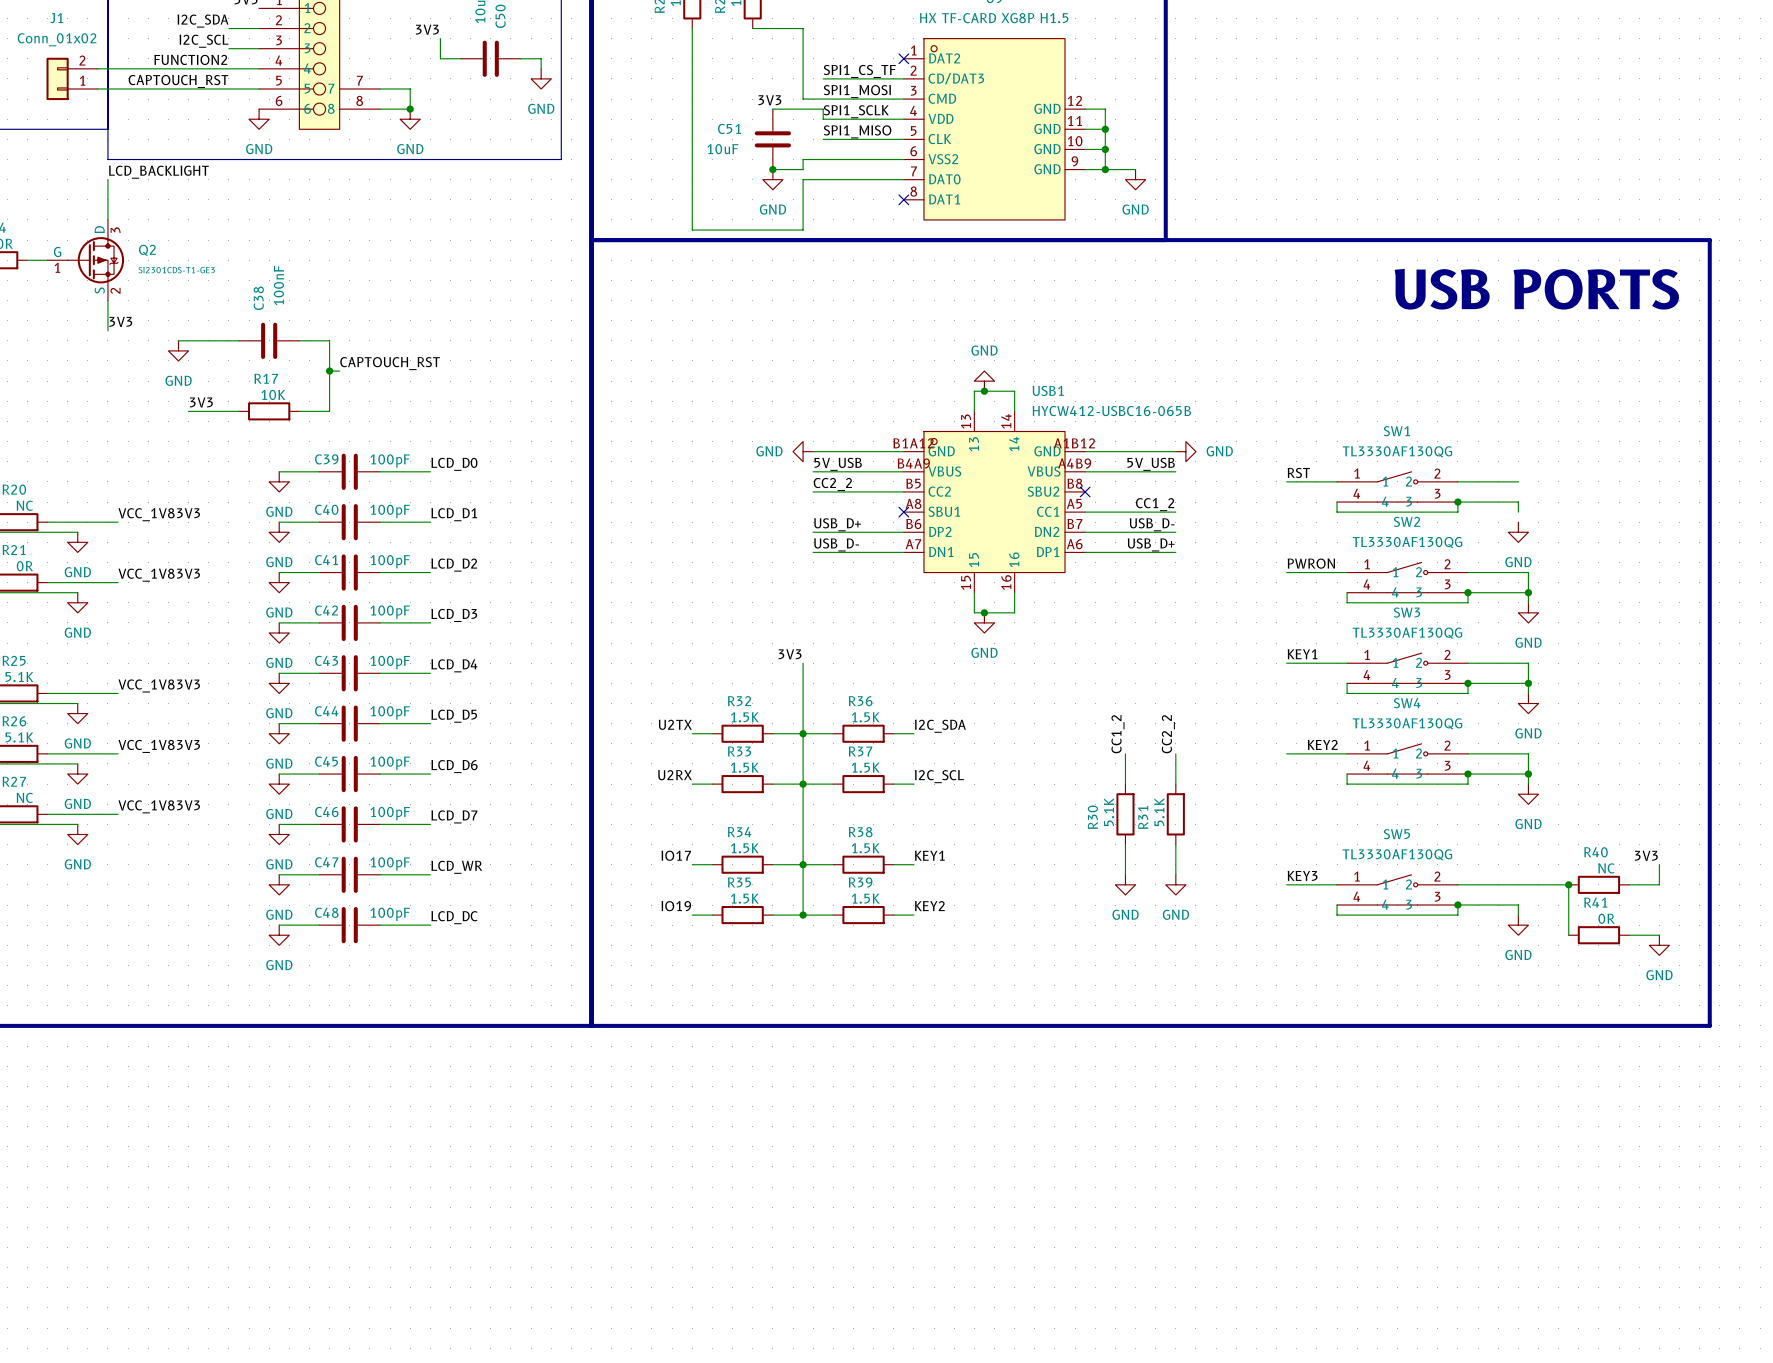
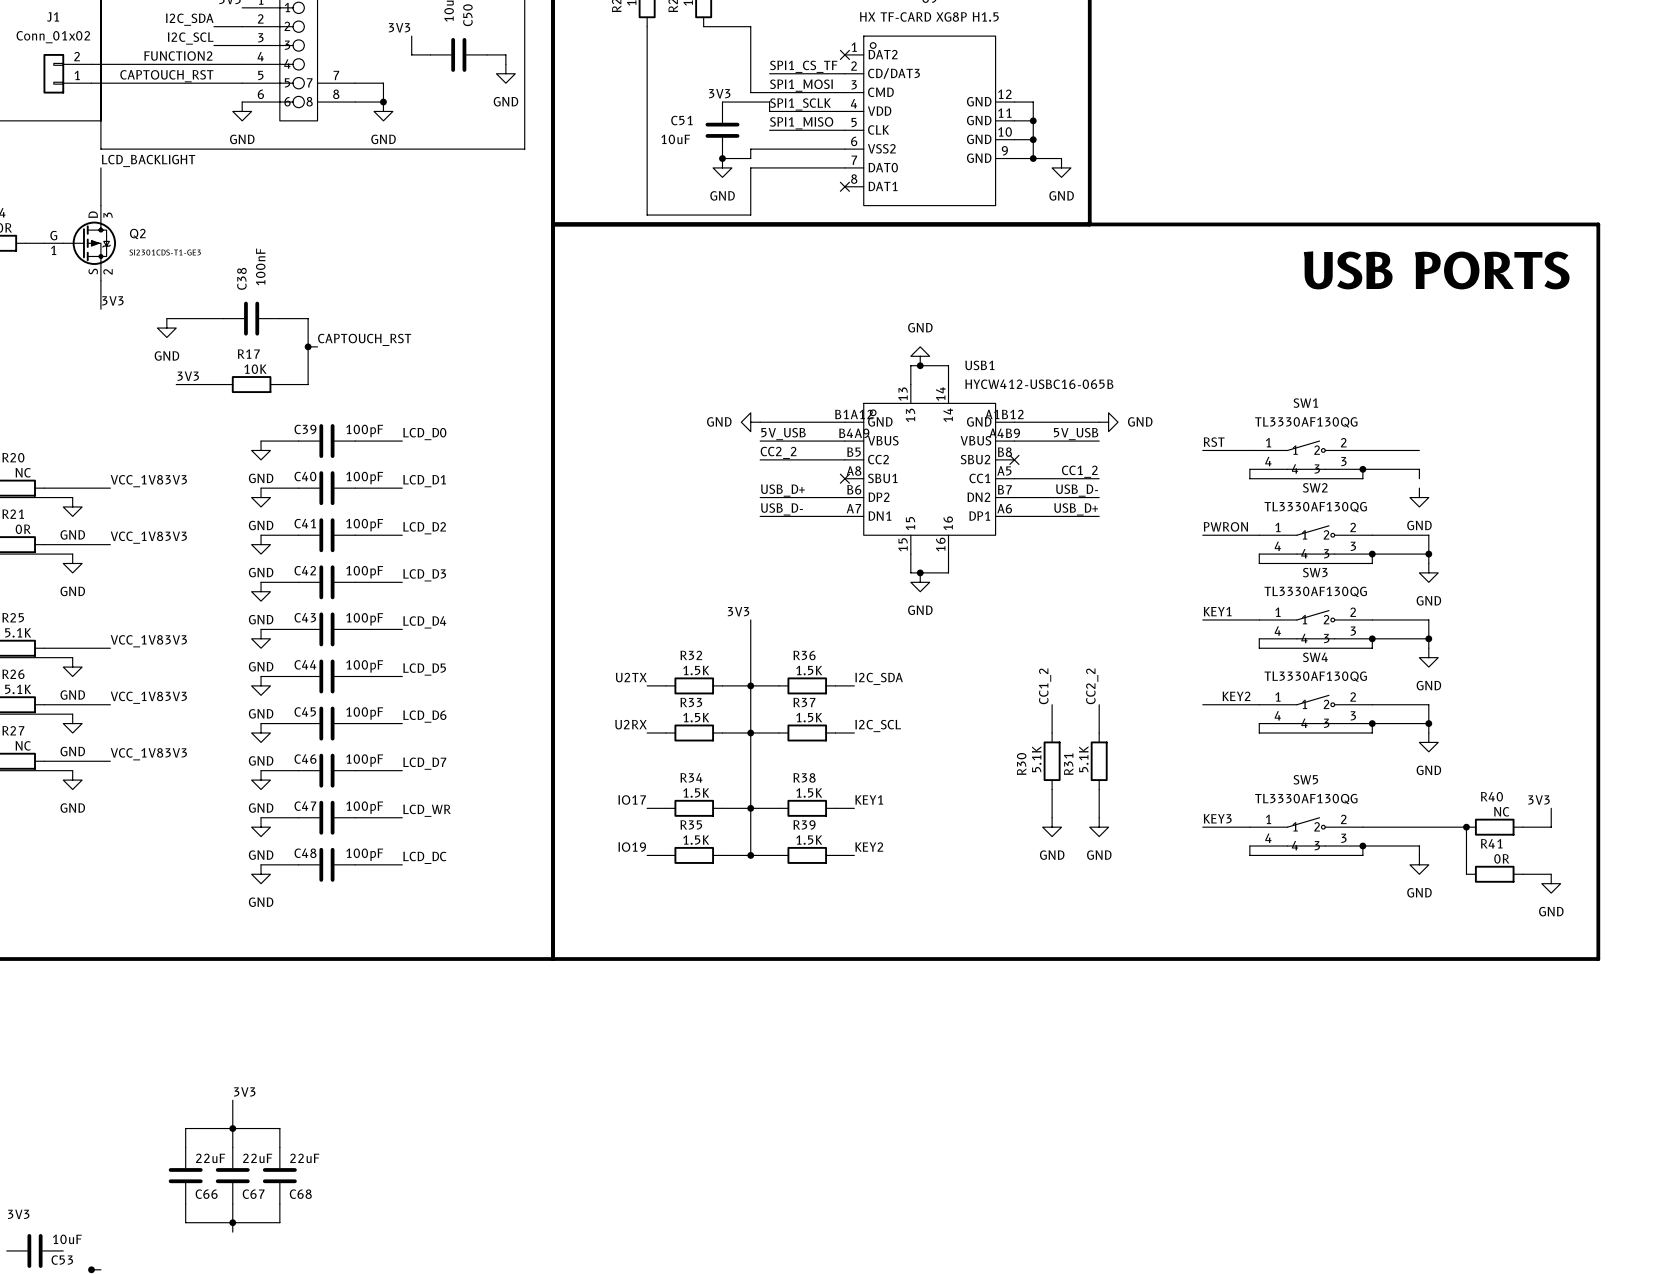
label: none -> 3V3 (244, 1091)
wire: none -> (232, 1100) (232, 1147)
junction: none -> (232, 1128)
wire: none -> (185, 1147) (185, 1128) (279, 1128) (279, 1147)
C66: none -> 22uF (185, 1175)
C67: none -> 22uF (232, 1175)
C68: none -> 22uF (279, 1175)
wire: none -> (185, 1203) (185, 1222) (279, 1222) (279, 1203)
wire: none -> (232, 1203) (232, 1232)
label: none -> 3V3 (18, 1214)
junction: none -> (232, 1222)
C53: none -> 10uF (35, 1250)
wire: none -> (91, 1269) (100, 1269)
junction: none -> (91, 1269)

